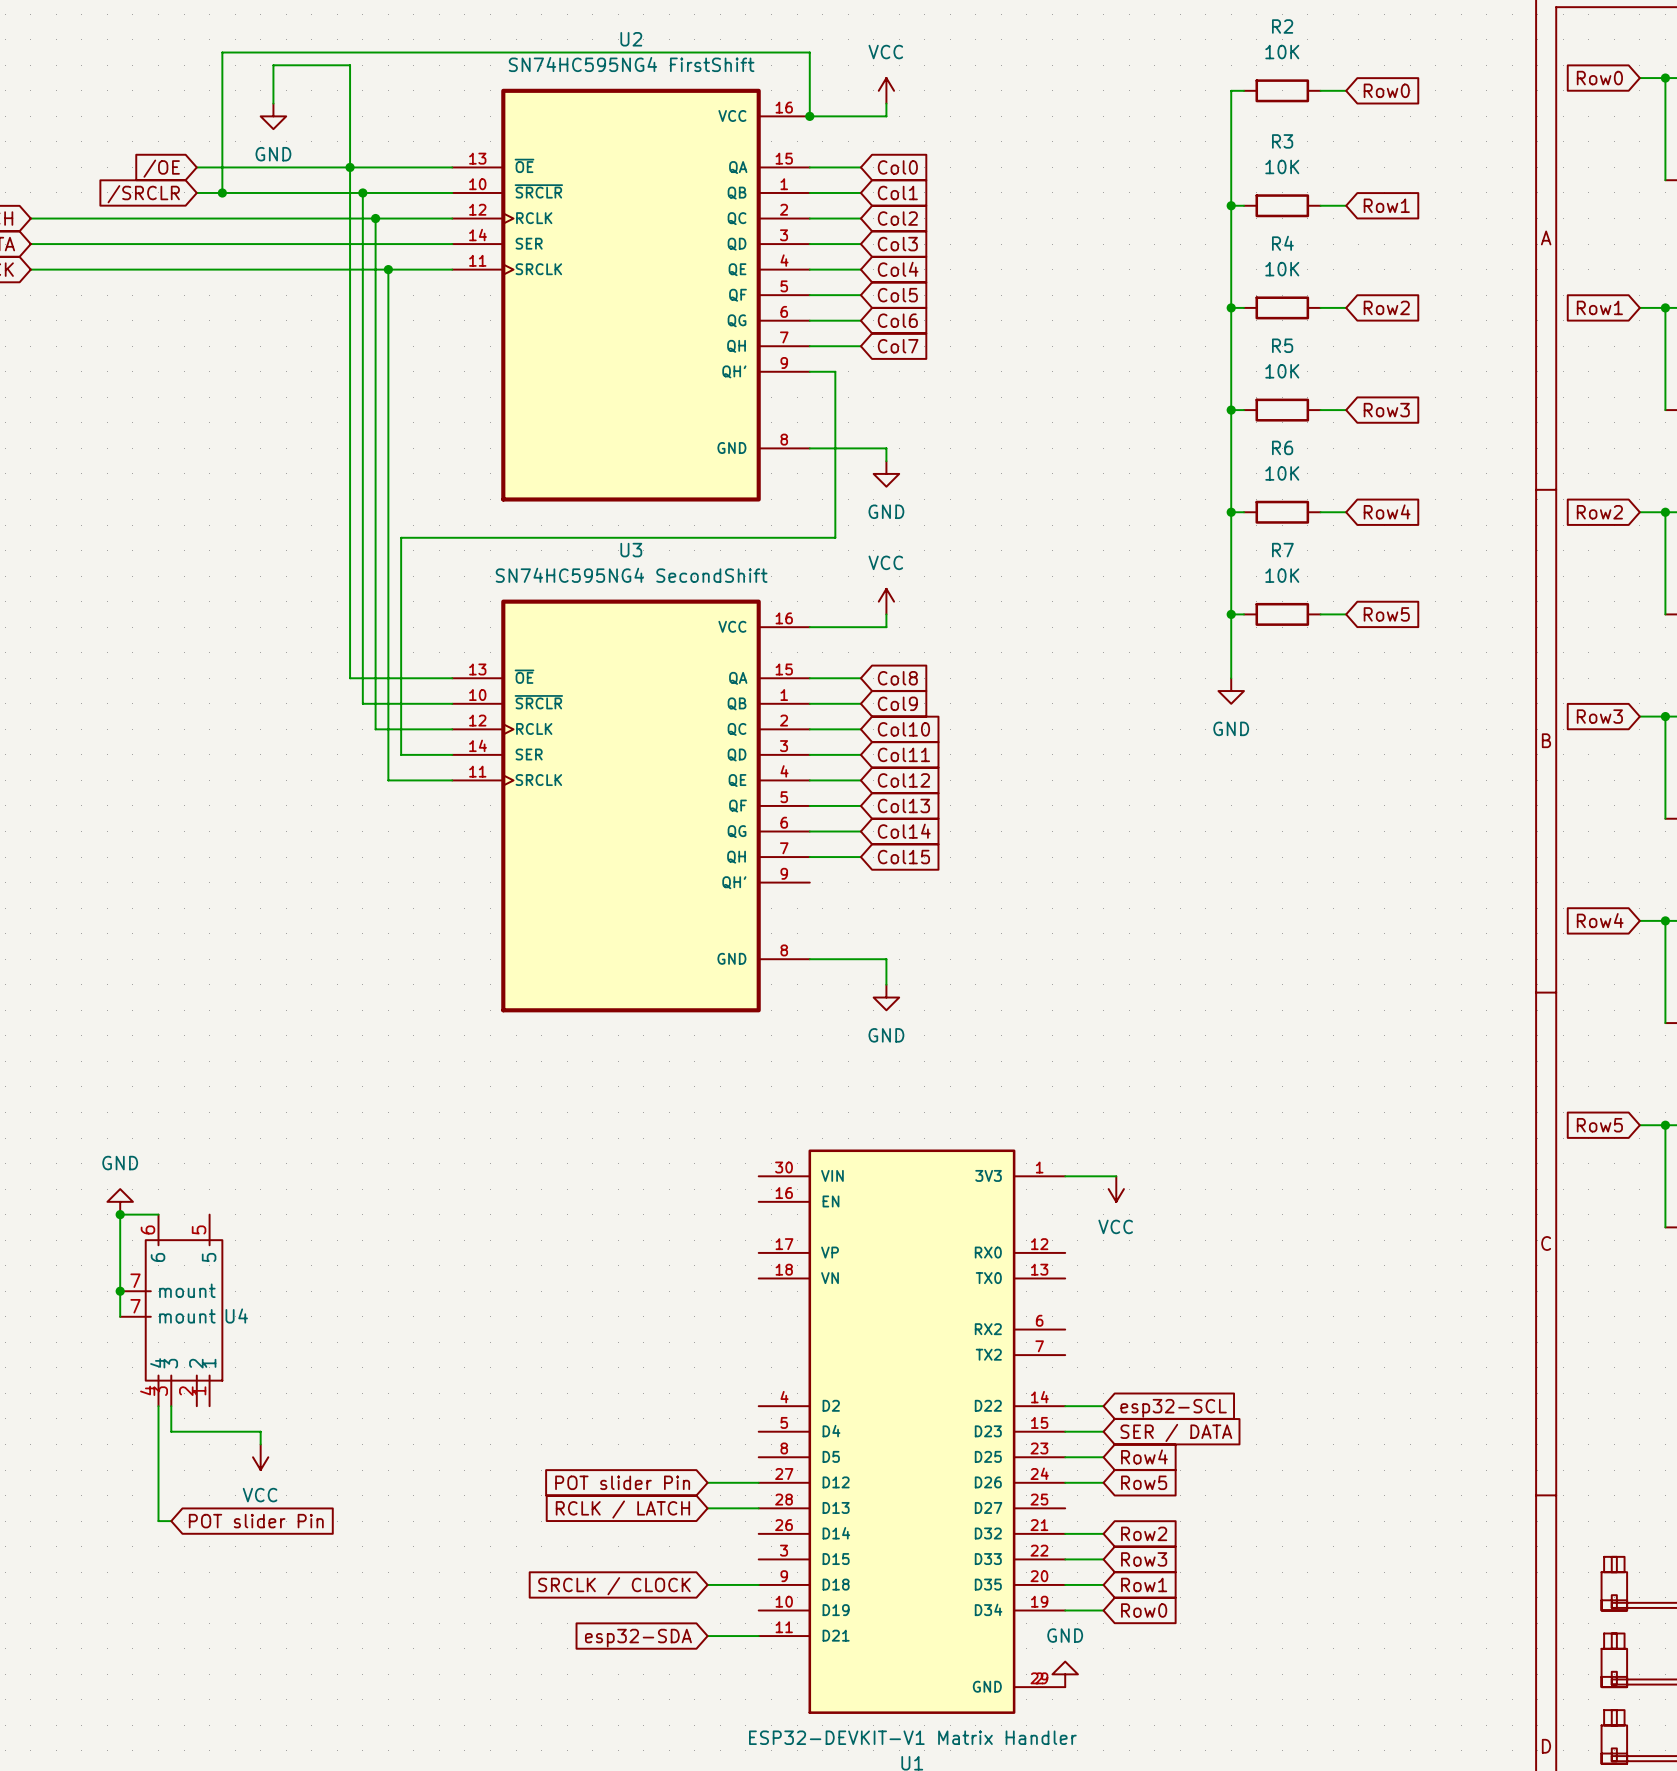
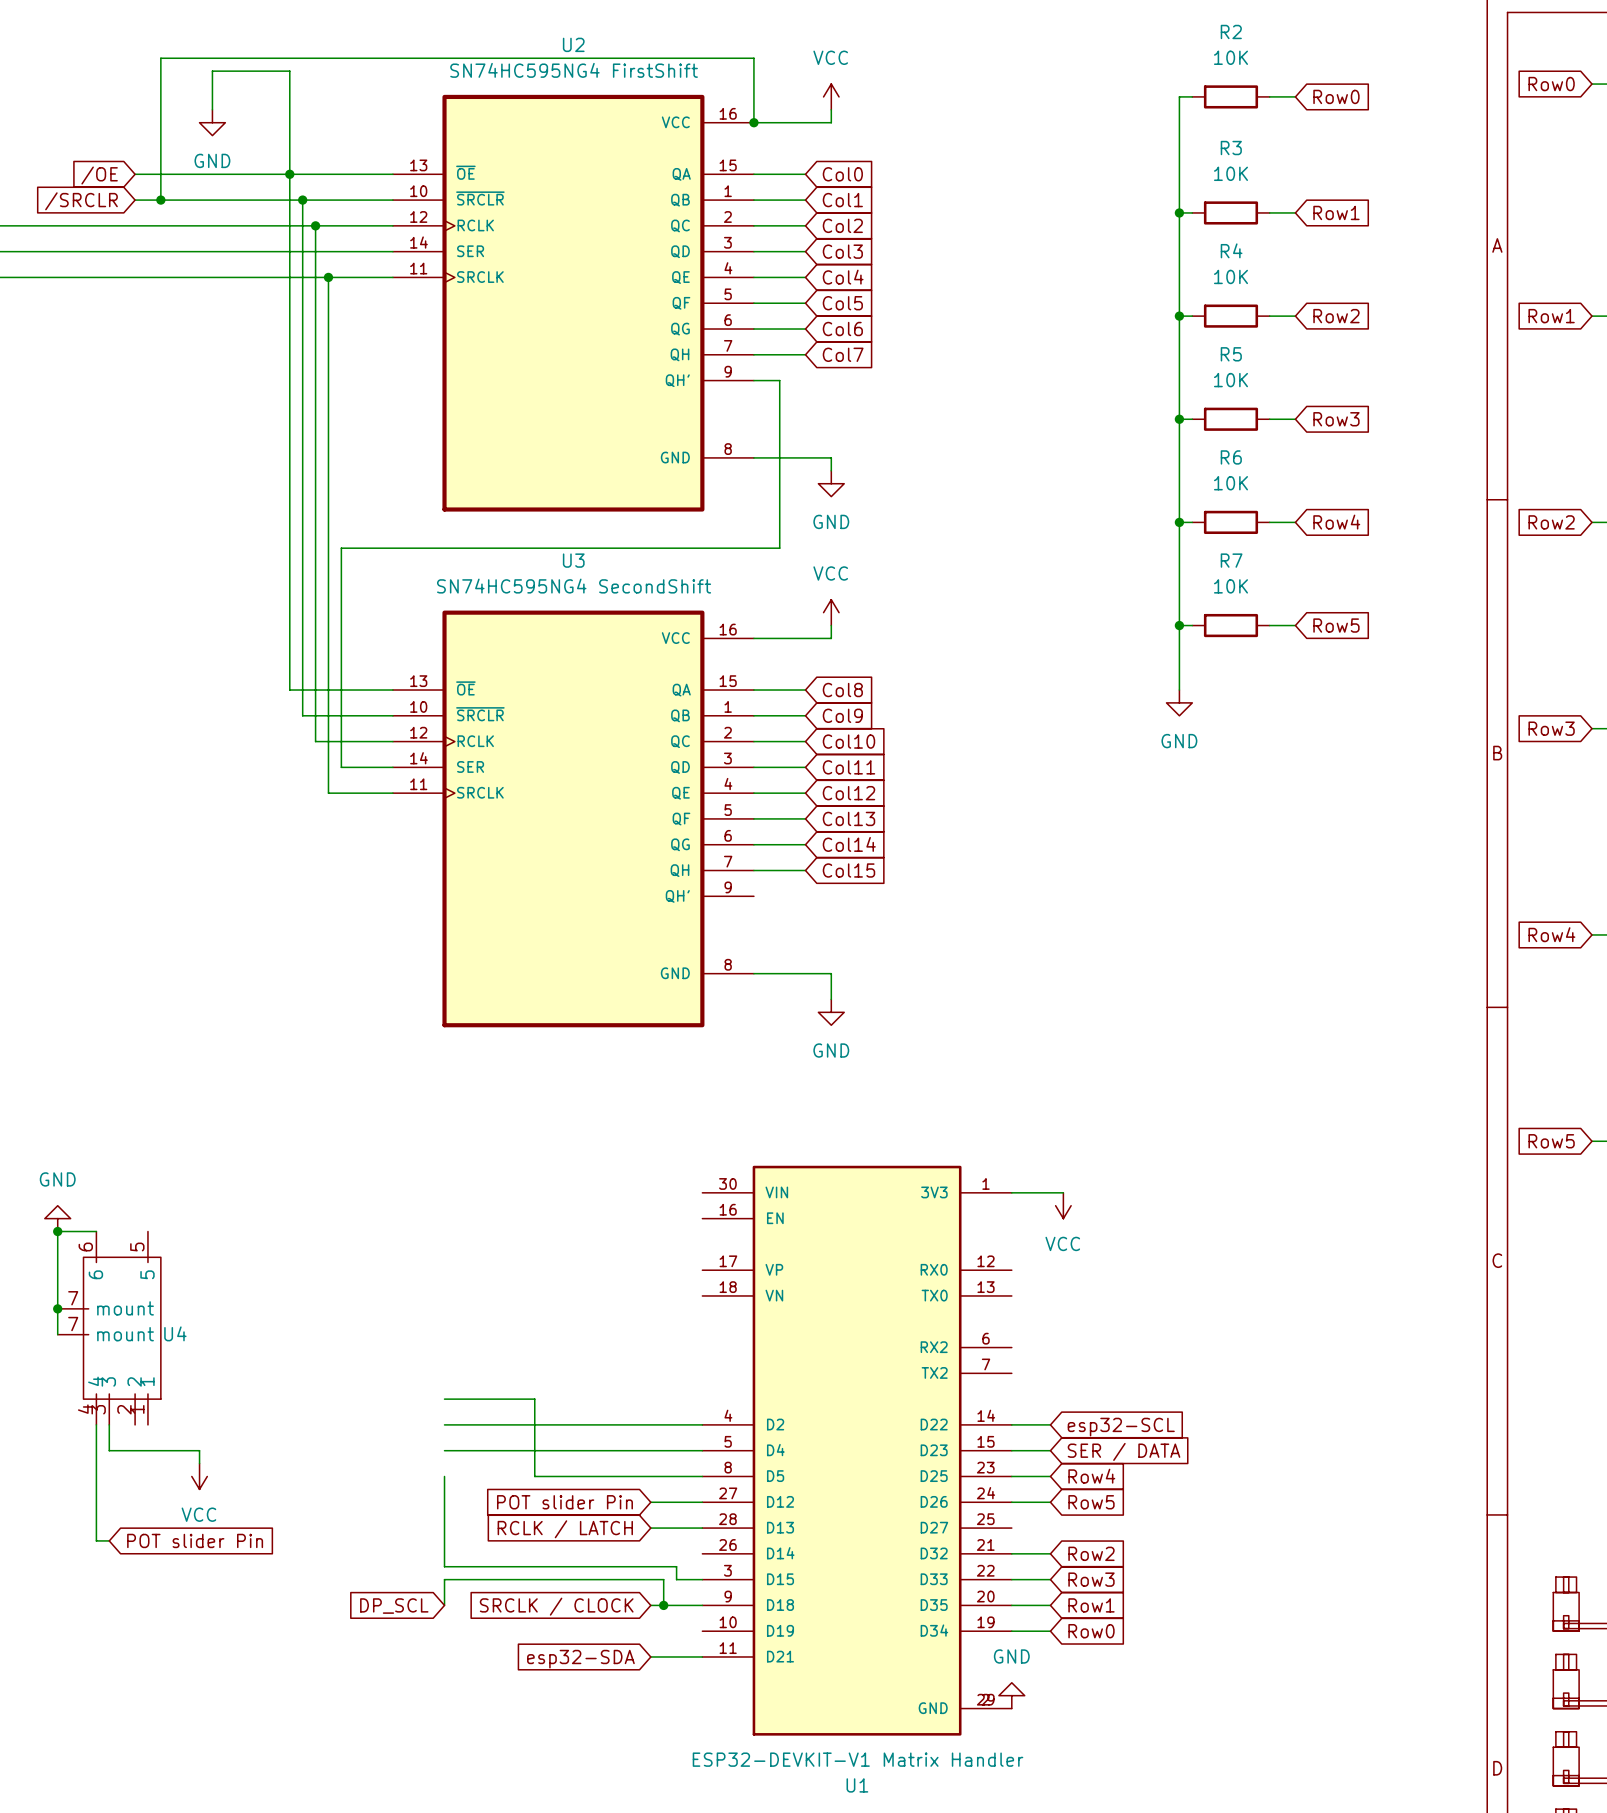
wire: none -> (444, 1399) (534, 1399) (534, 1476) (702, 1476)
wire: none -> (444, 1424) (702, 1424)
wire: none -> (444, 1450) (702, 1450)
wire: none -> (444, 1476) (444, 1566) (676, 1566) (676, 1579) (702, 1579)
wire: none -> (444, 1605) (444, 1579) (663, 1579) (663, 1605)
junction: none -> (663, 1605)
global label: none -> DP_SCL (394, 1606)

